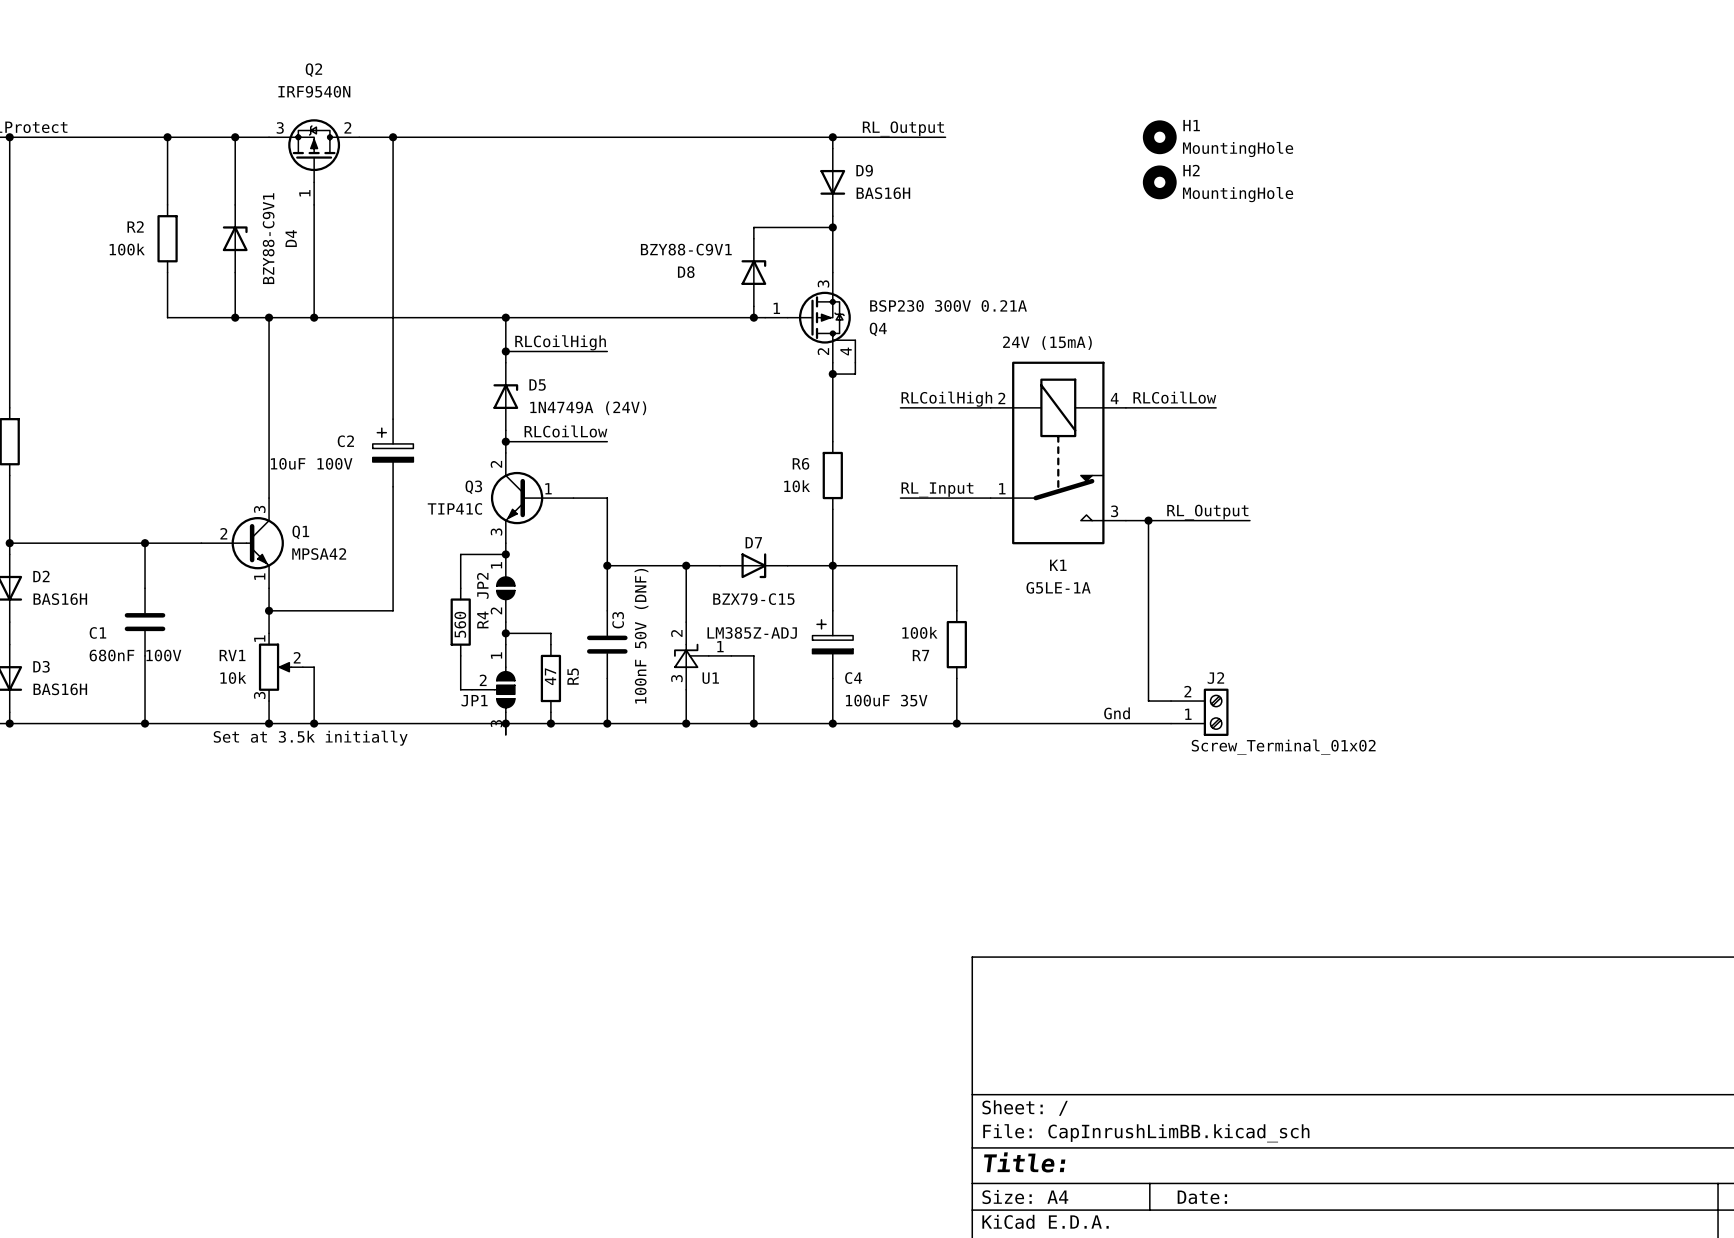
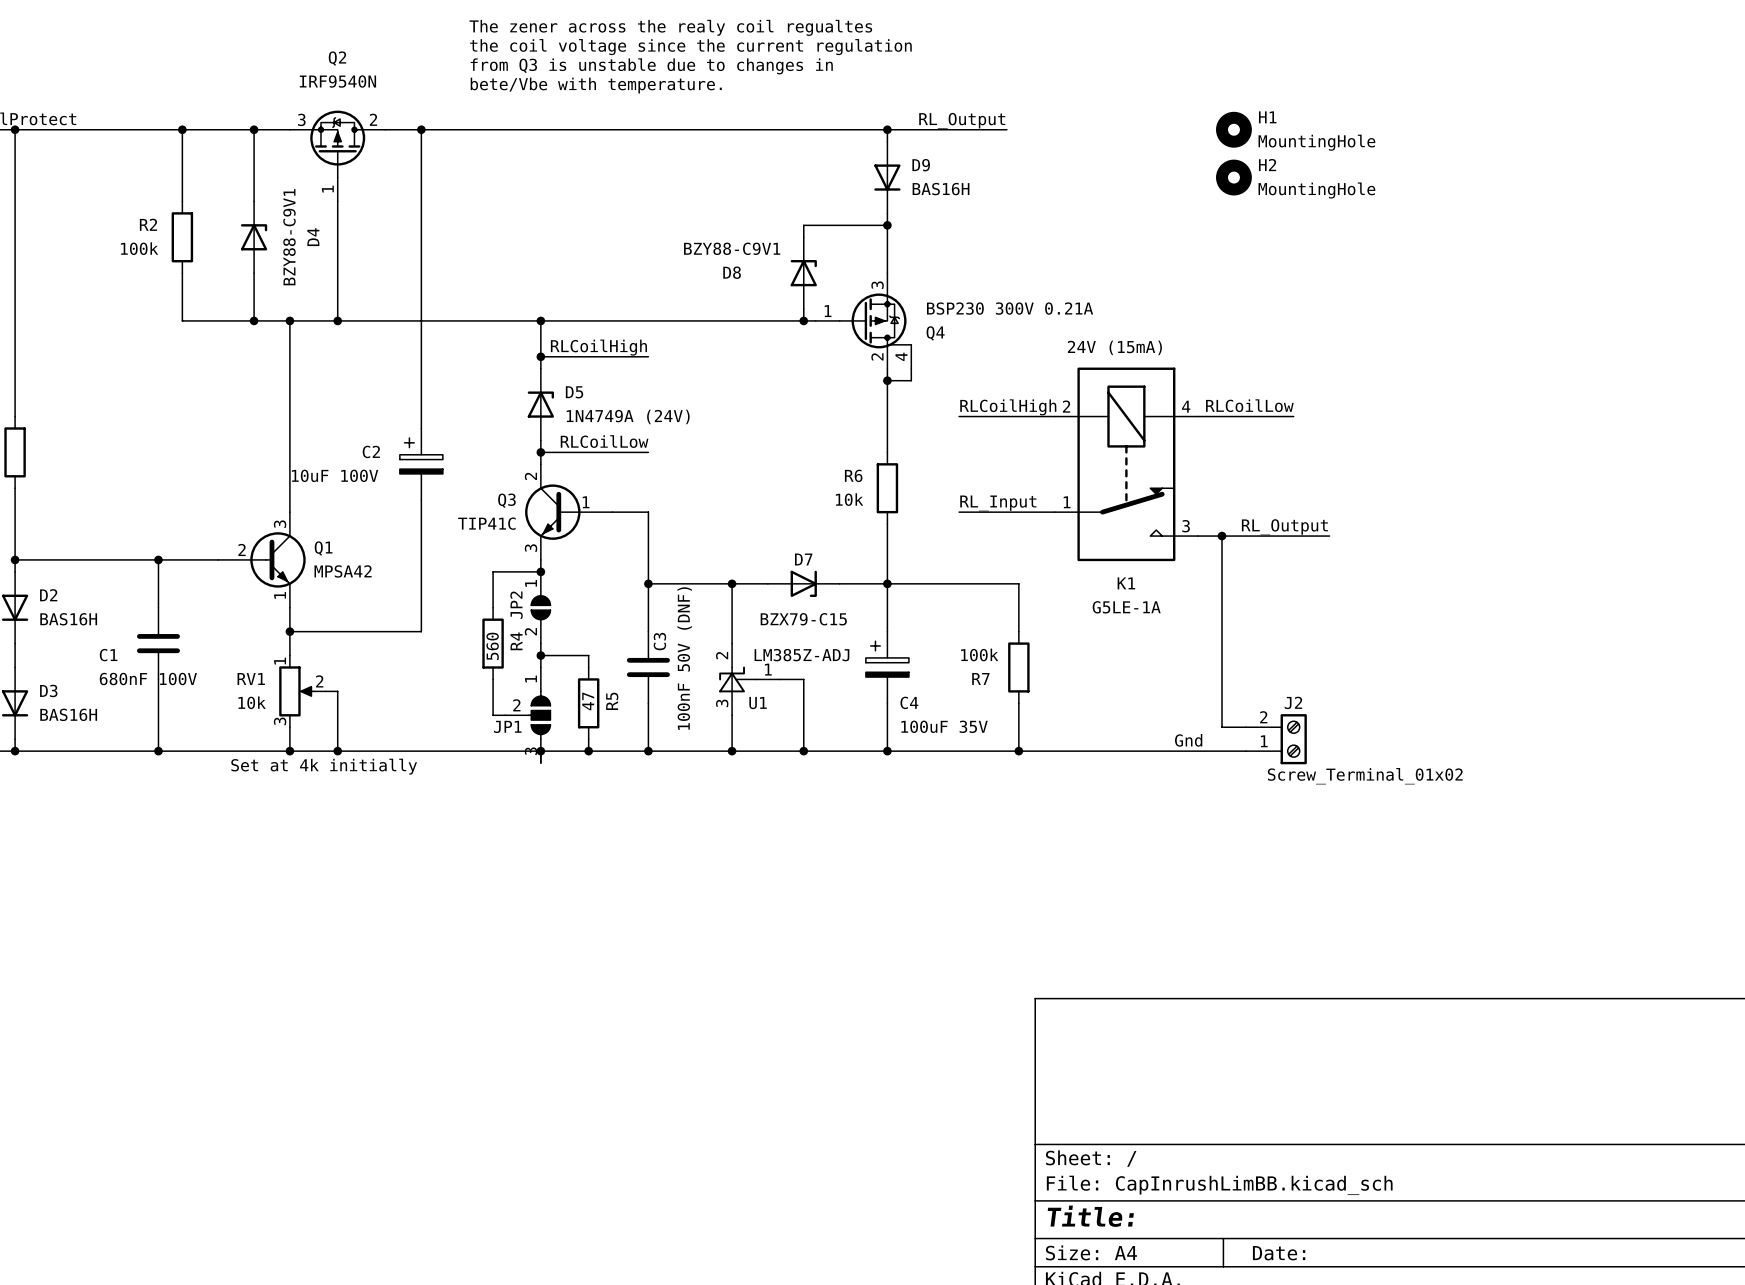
text: none -> The zener across the realy coil regualtes (670, 27)
text: none -> the coil voltage since the current regulation (690, 47)
text: none -> from Q3 is unstable due to changes in (651, 66)
text: none -> bete/Vbe with temperature. (596, 85)
text: Set at 3.5k initially (310, 738) -> Set at 4k initially (324, 766)

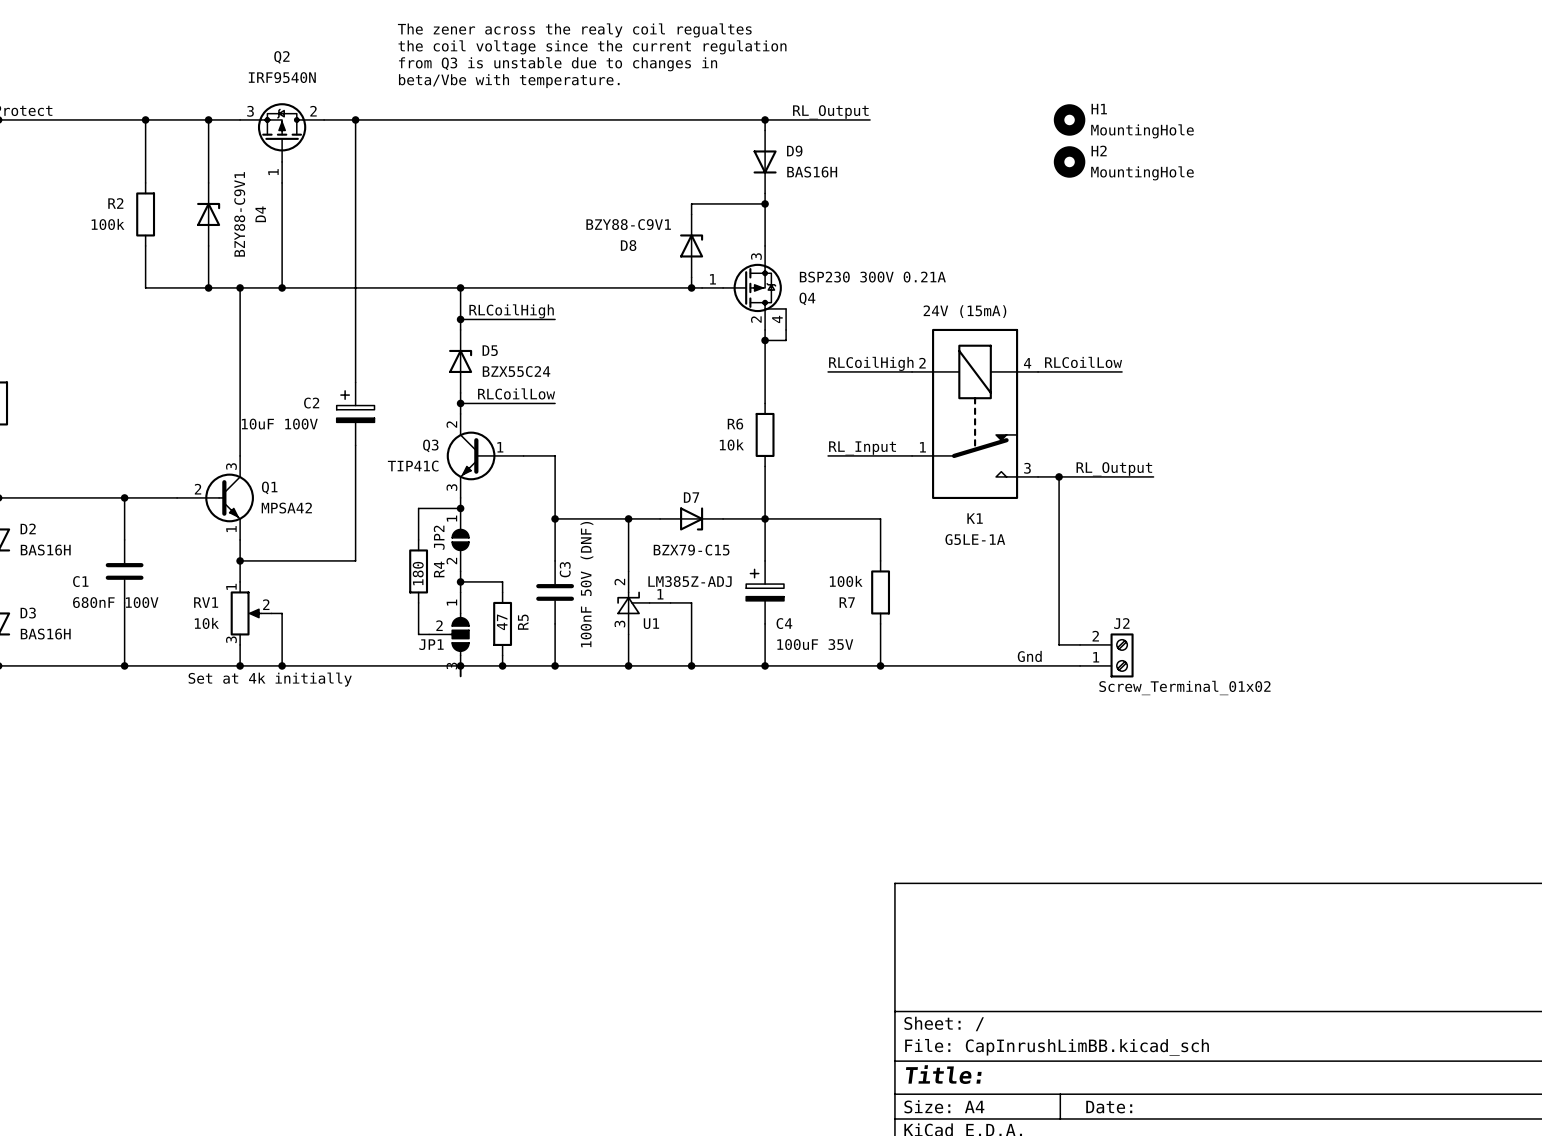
text: bete/Vbe with temperature. (596, 85) -> beta/Vbe with temperature. (509, 81)
D5 value: 1N4749A (24V) (628, 416) -> BZX55C24 (516, 371)
R4 value: 560 (492, 646) -> 180 (418, 573)

